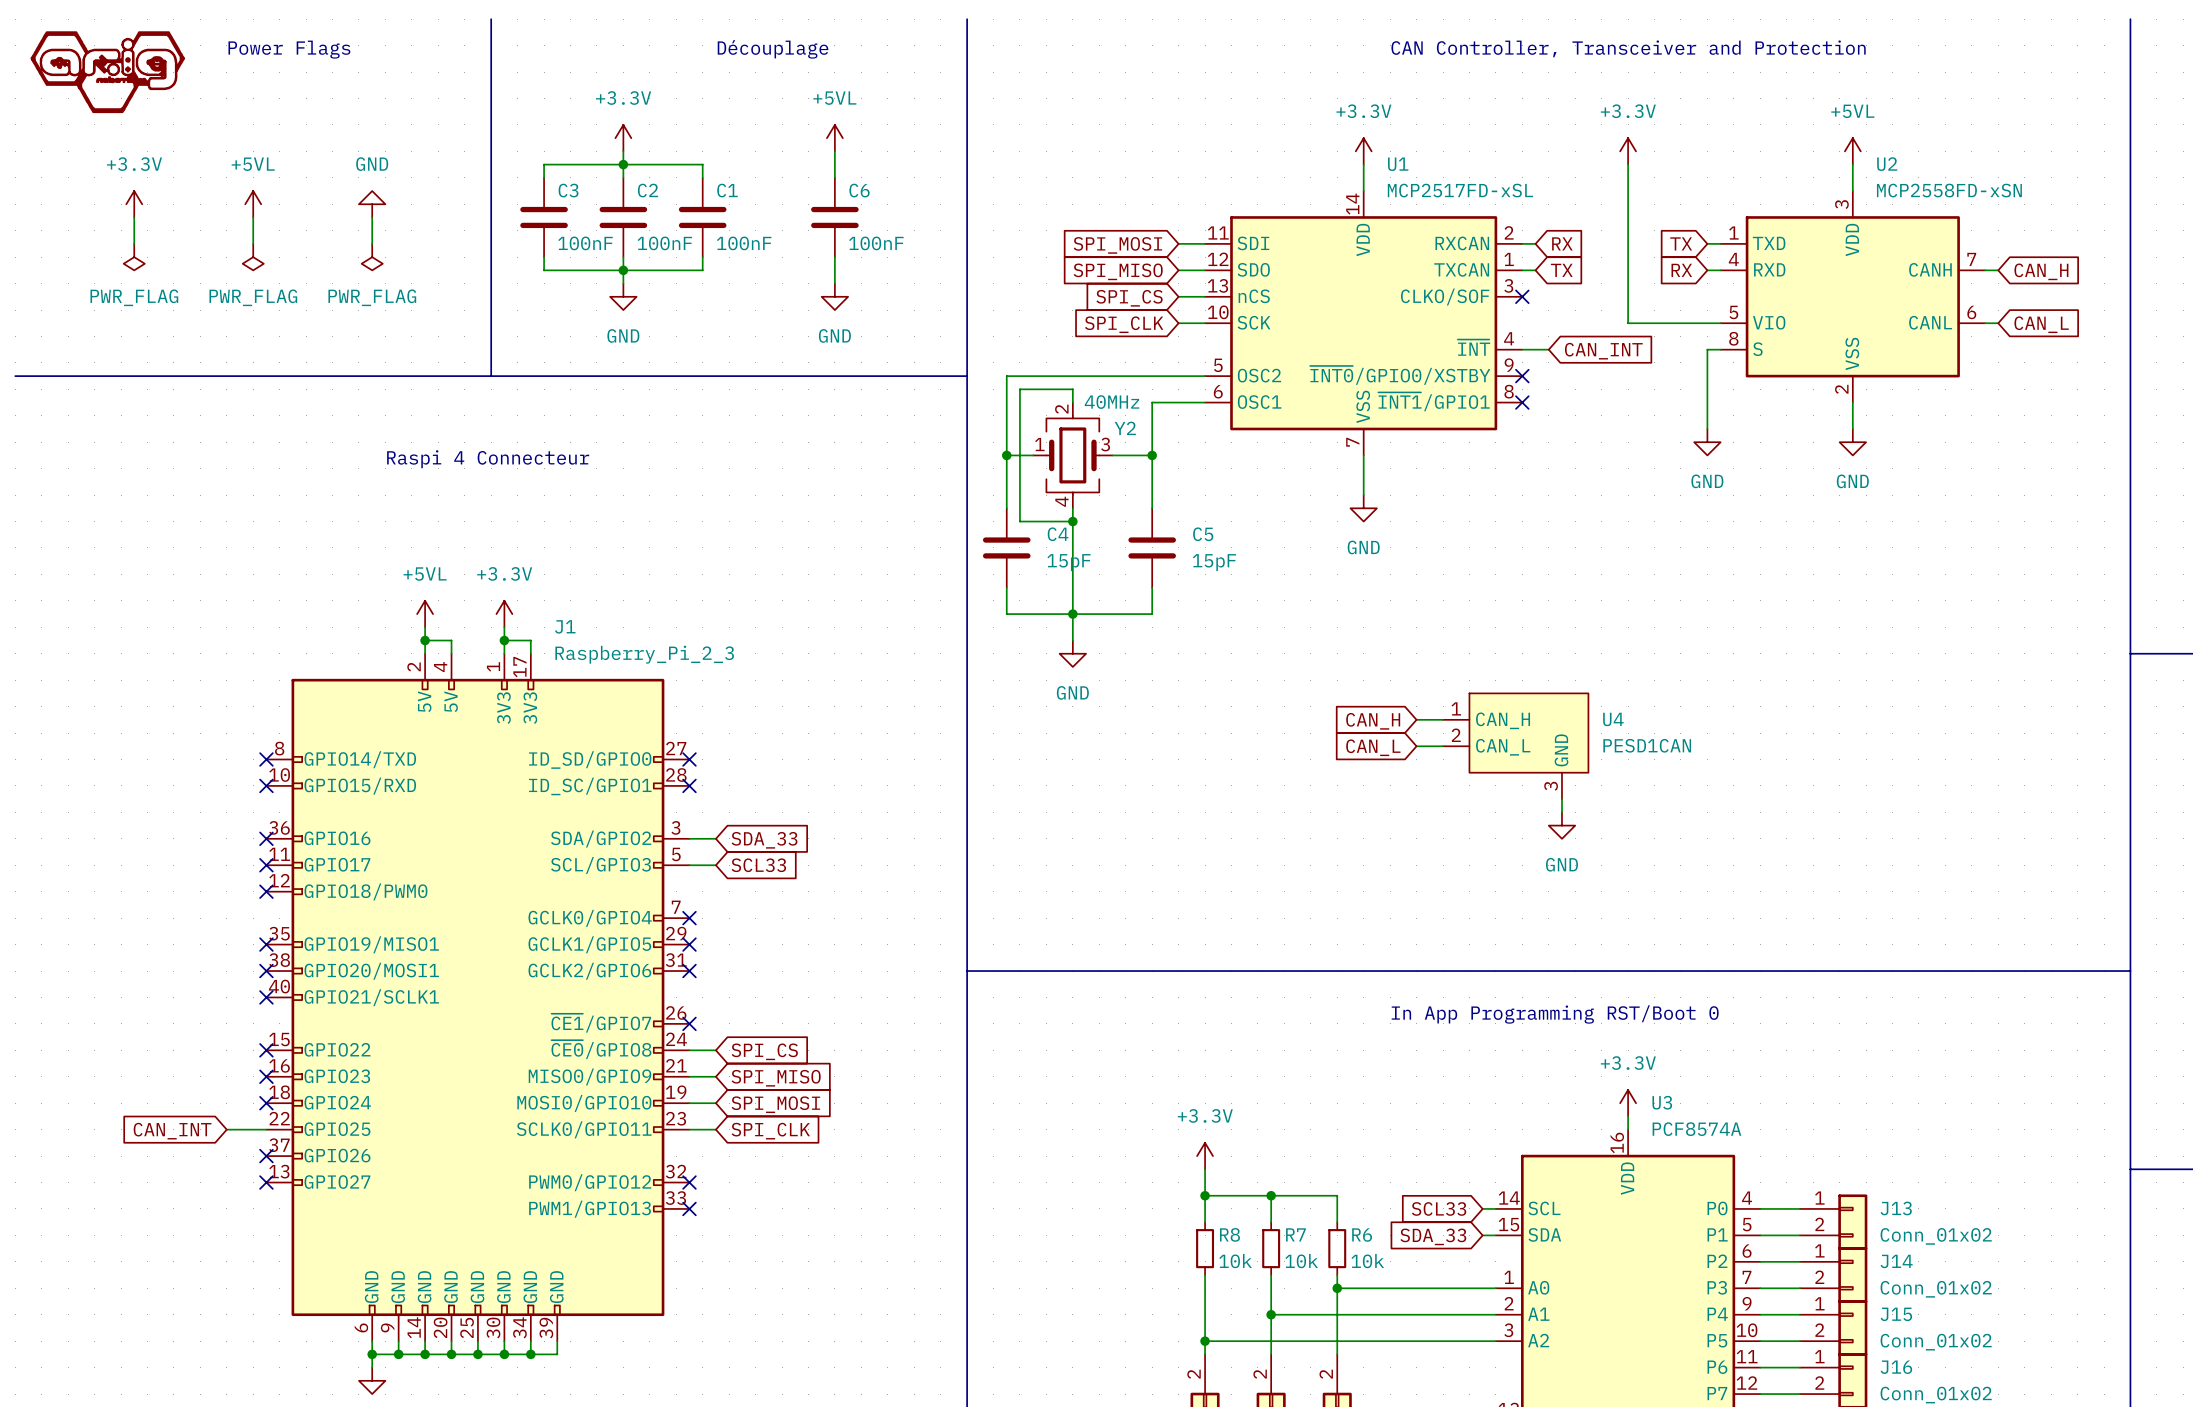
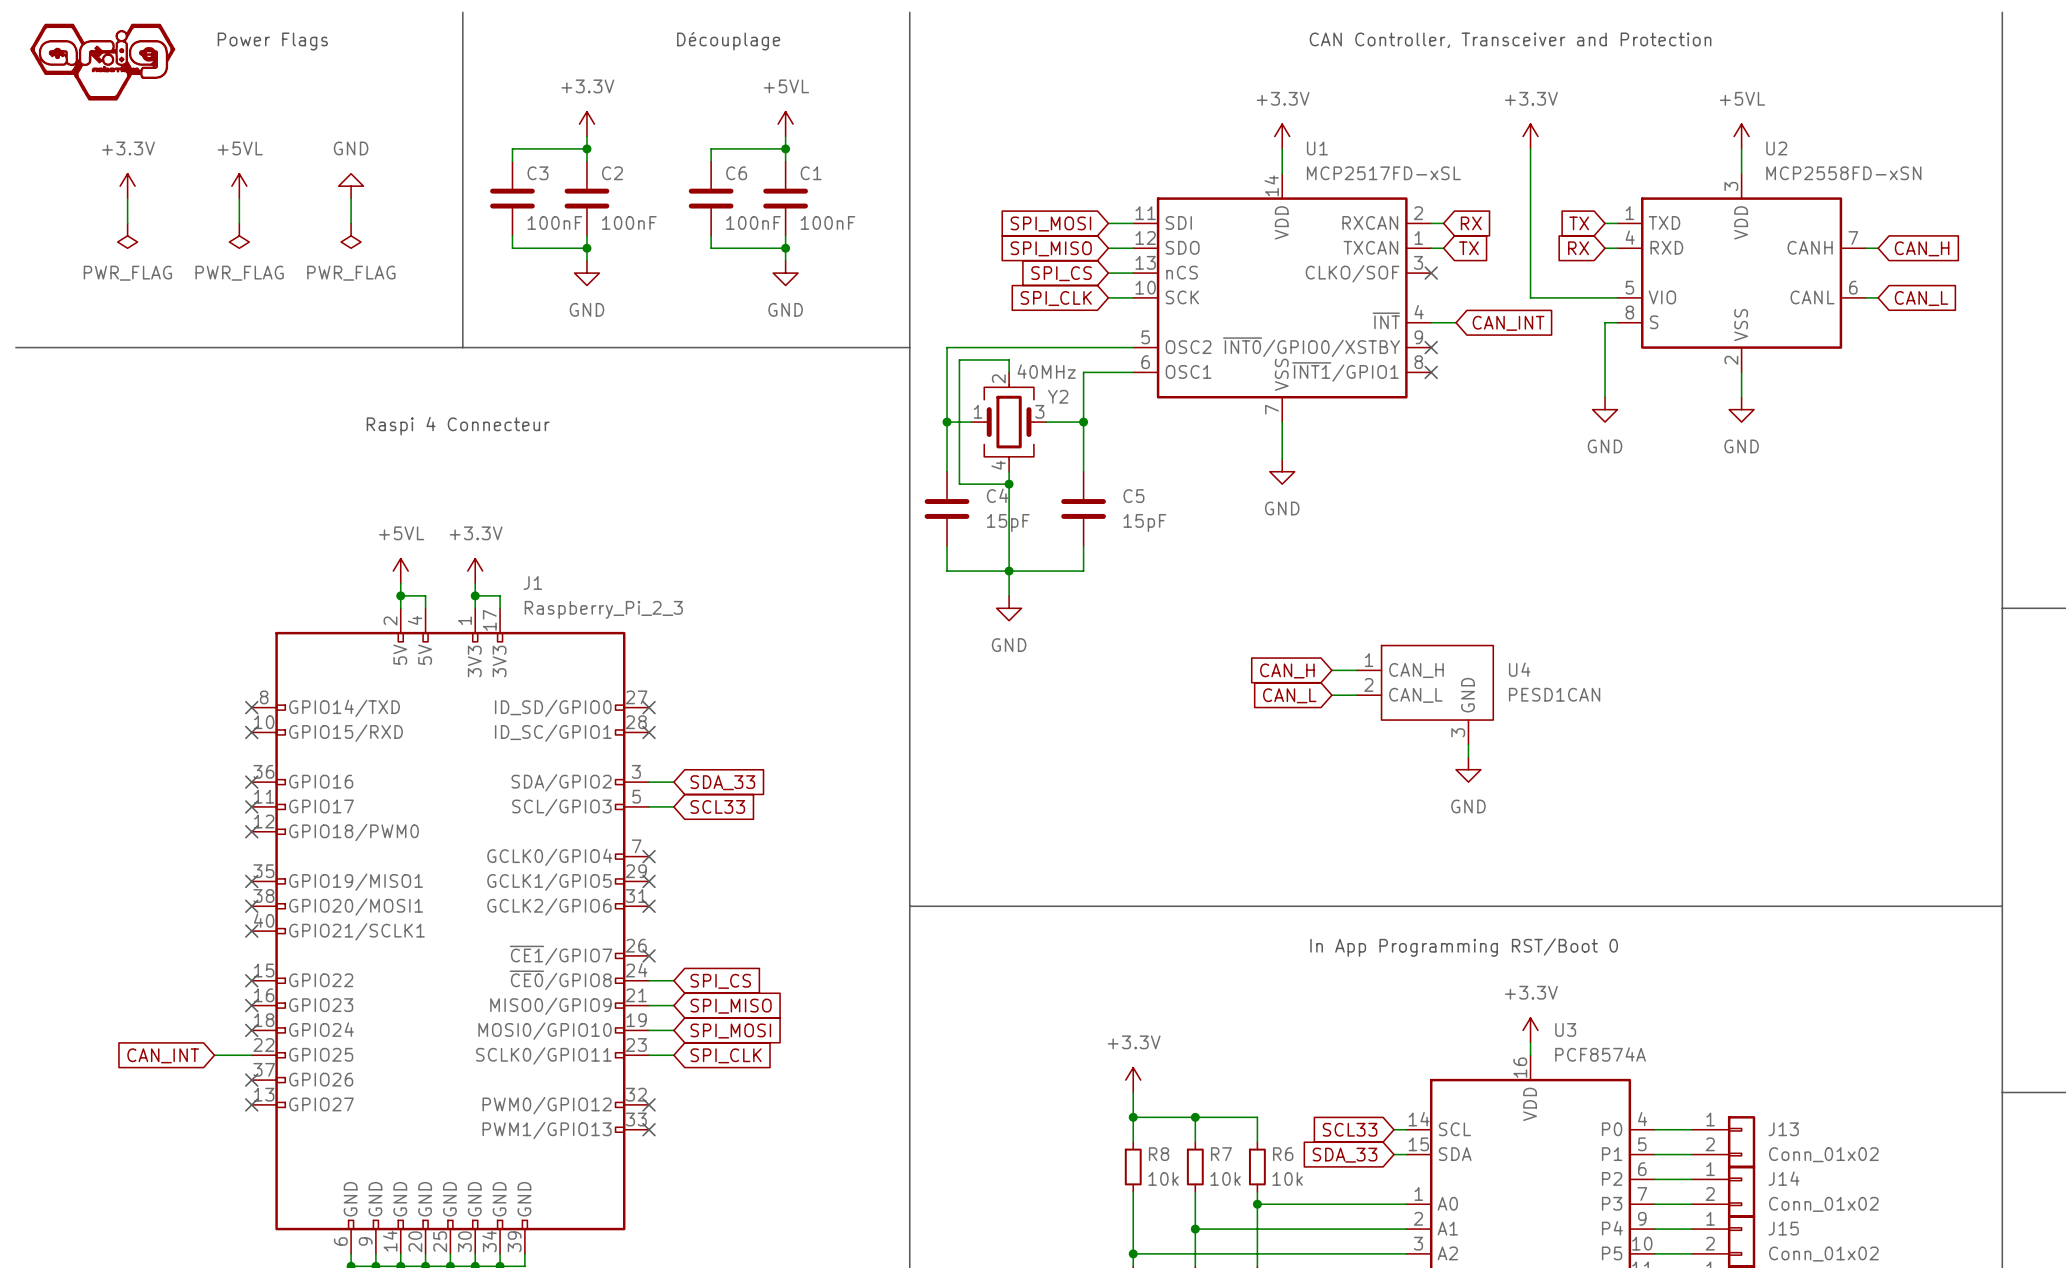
wire: (623, 164) (702, 164) (702, 177) -> none
wire: none -> (785, 148) (711, 148) (711, 161)
junction: none -> (785, 148)
C6 name: C6 (859, 190) -> C1 (811, 173)
C1: 100nF (702, 217) -> none
C6: none -> 100nF (711, 198)
wire: (702, 257) (702, 270) (623, 270) -> none
wire: none -> (711, 235) (711, 248) (785, 248)
junction: none -> (785, 248)

